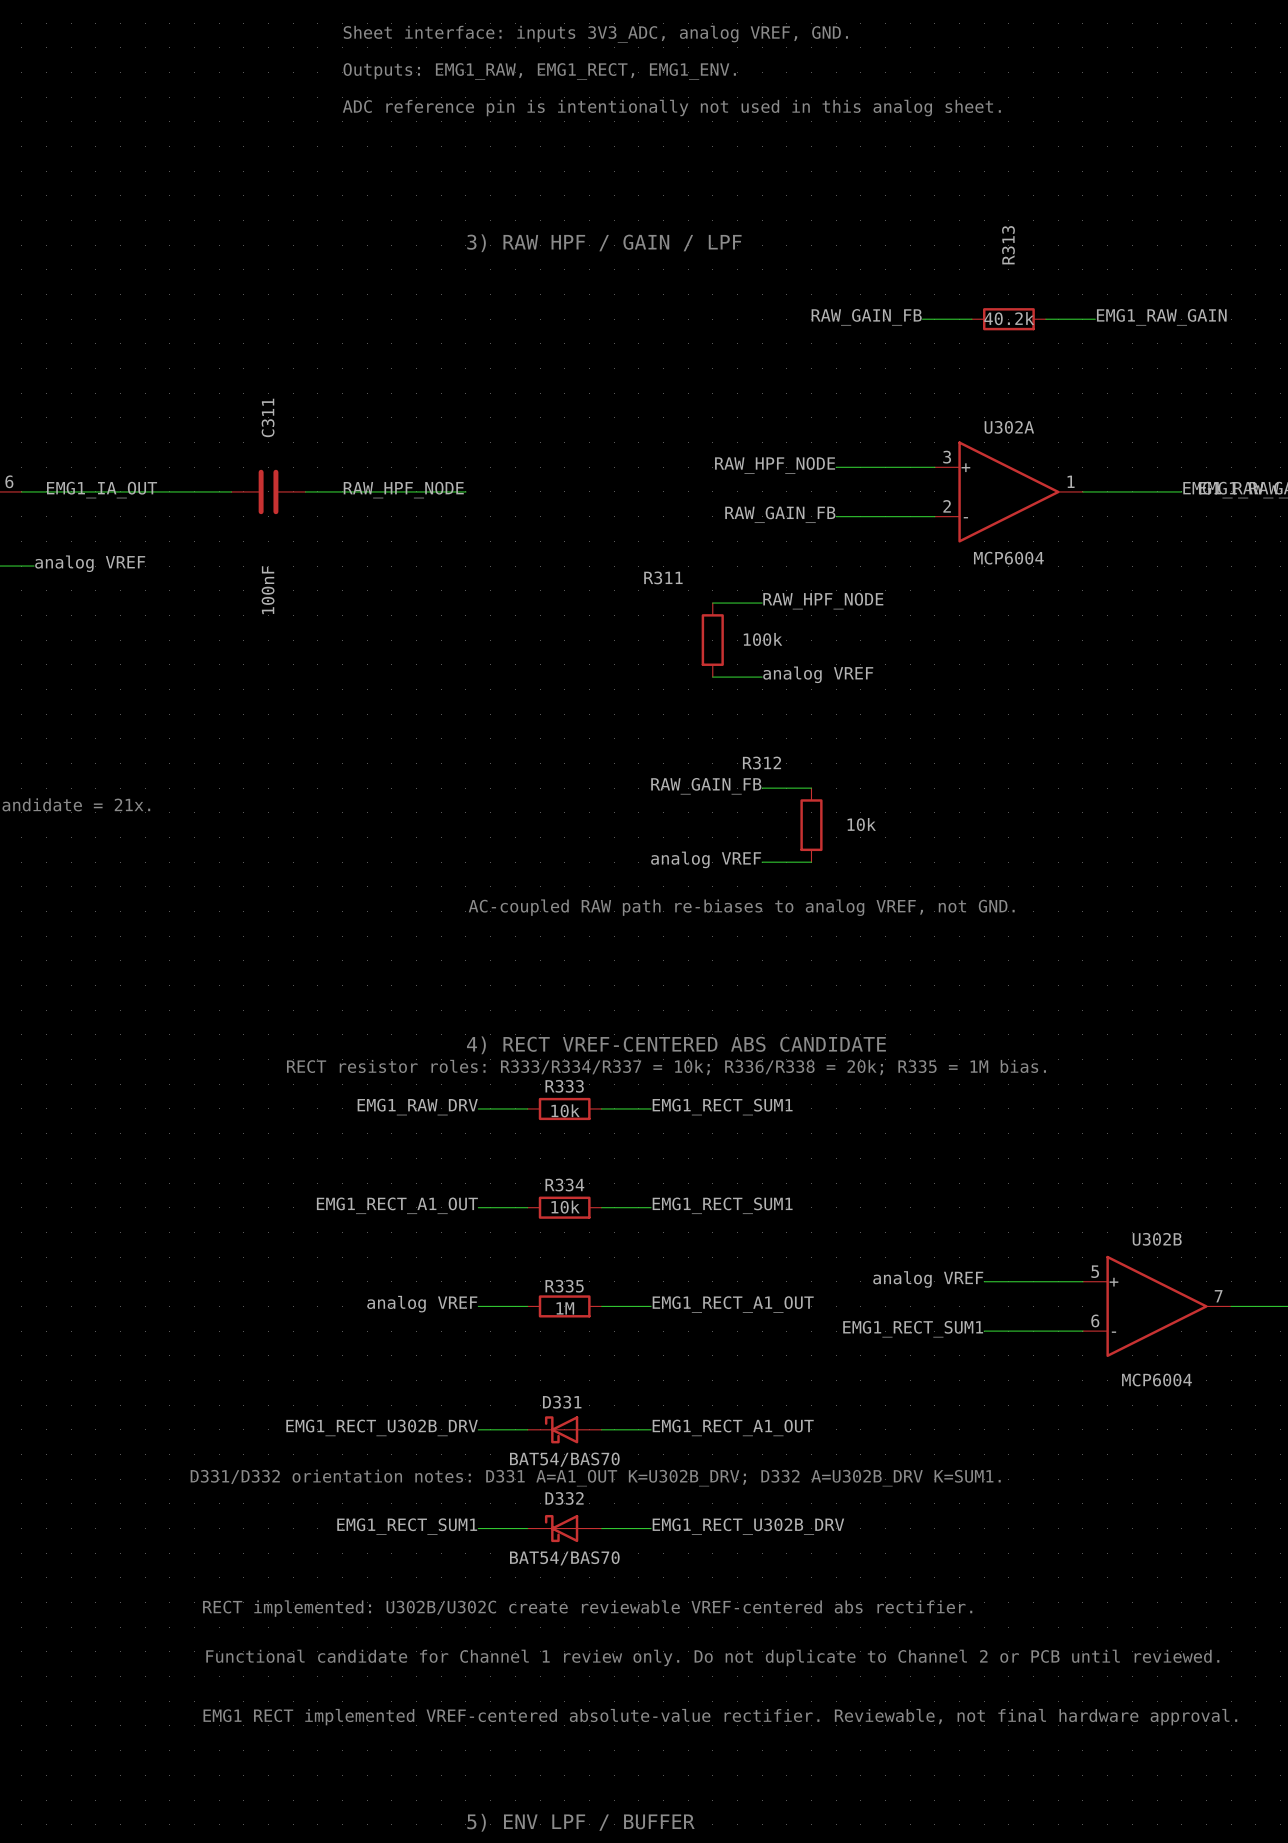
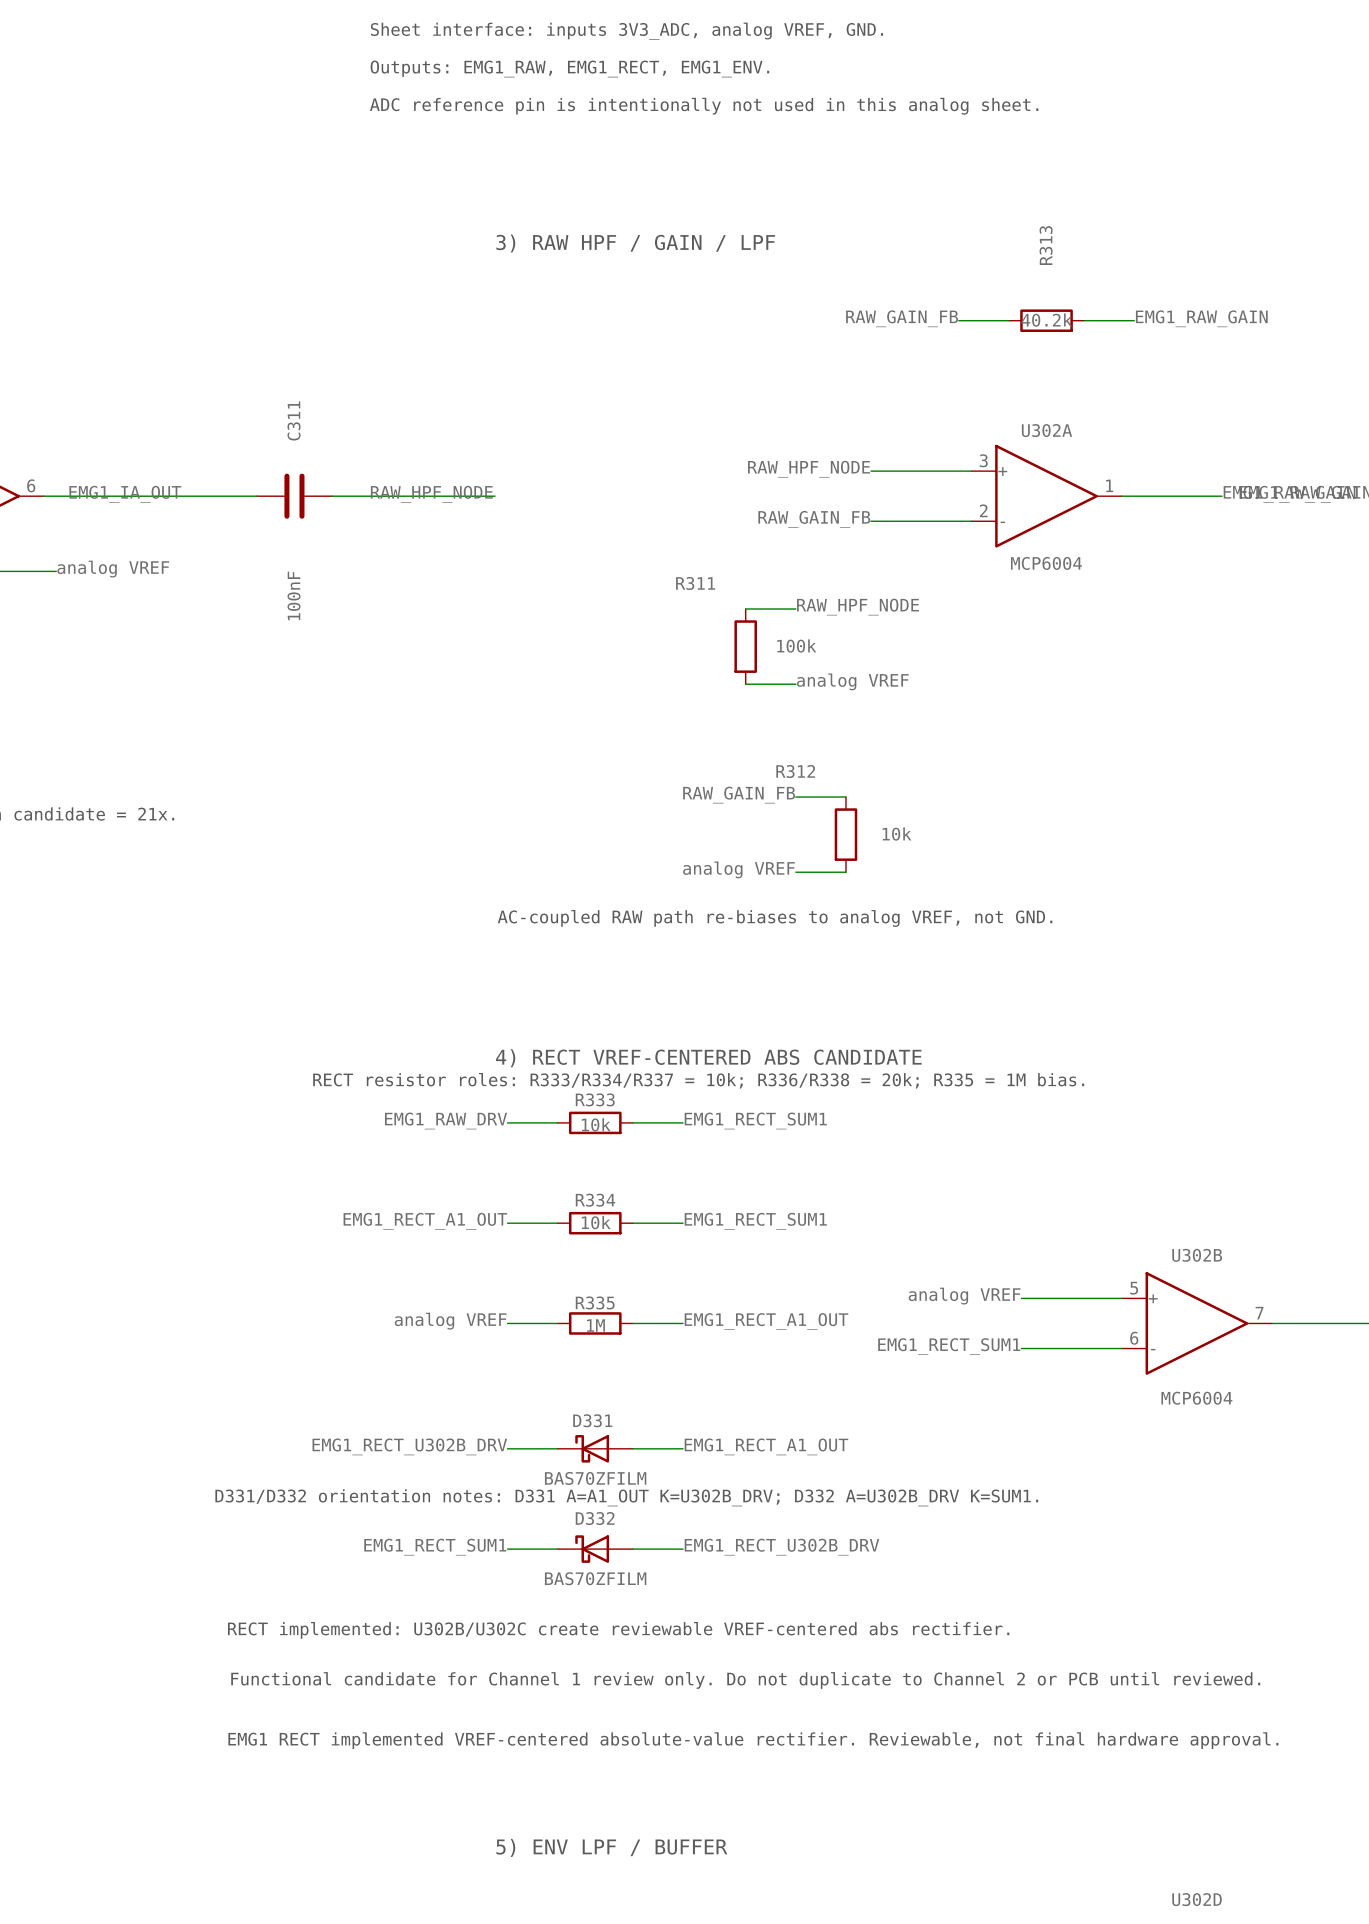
D331 value: BAT54/BAS70 (564, 1459) -> BAS70ZFILM (595, 1478)
D332 value: BAT54/BAS70 (564, 1558) -> BAS70ZFILM (595, 1578)

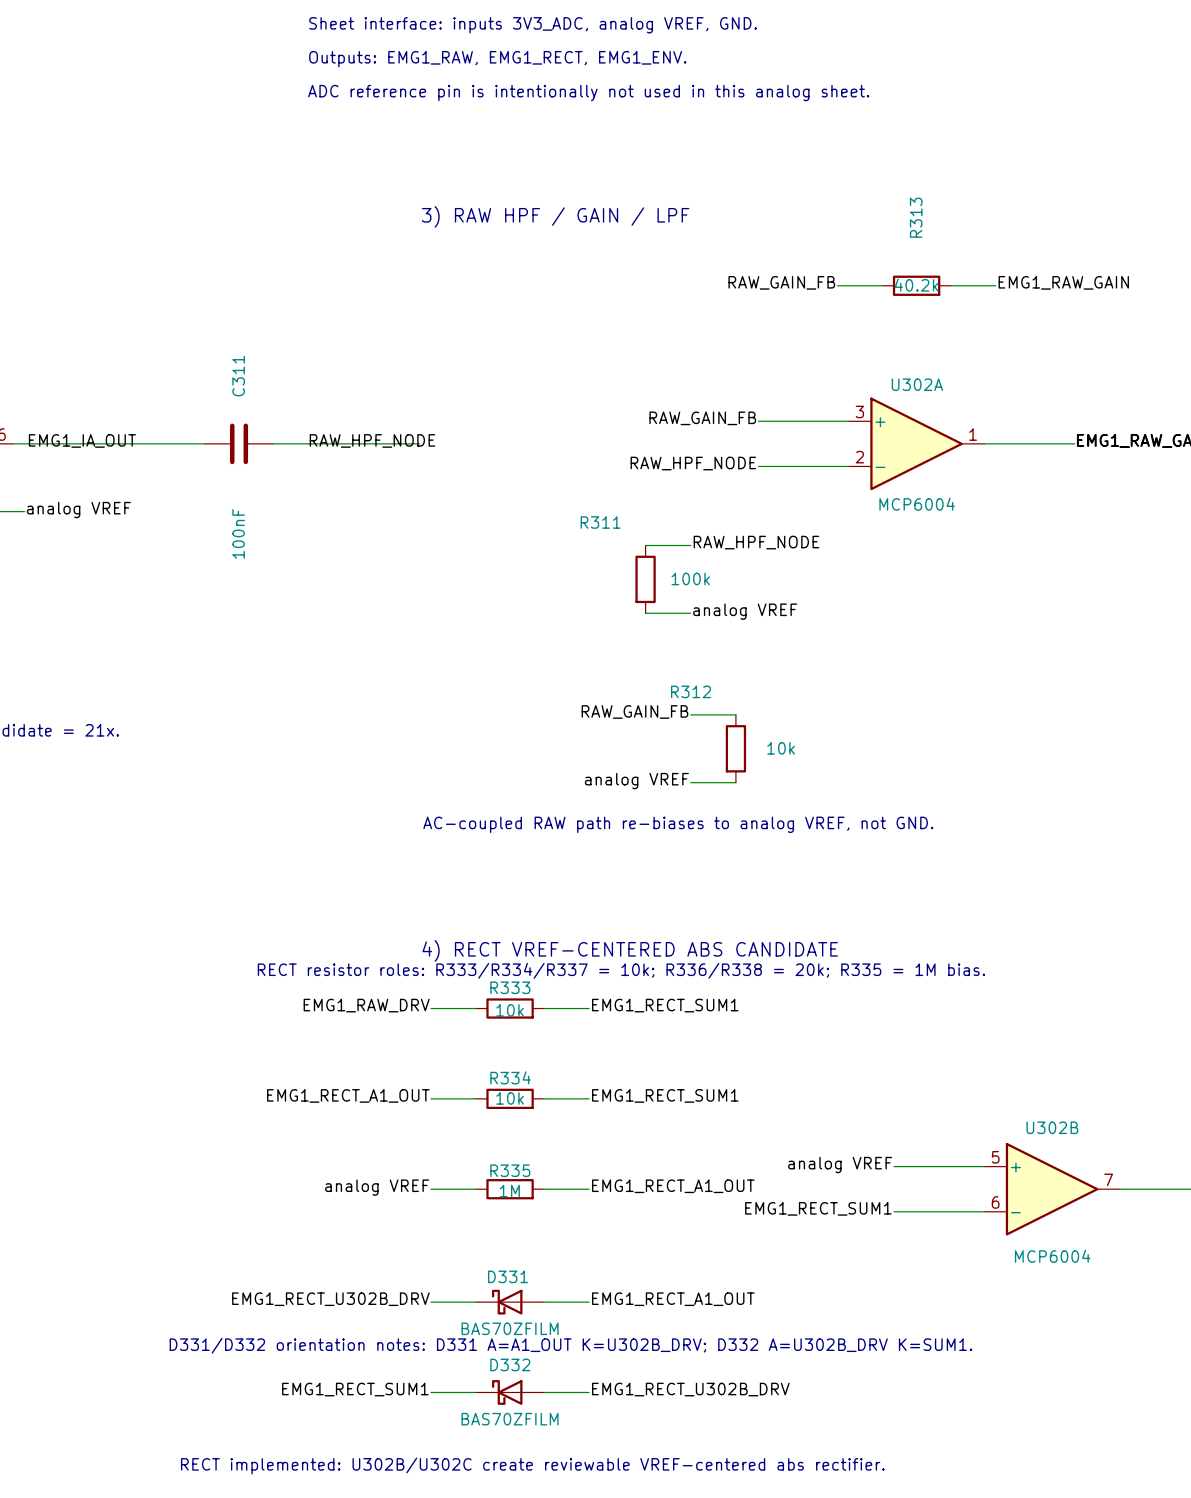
label: RAW_HPF_NODE (808, 469) -> RAW_GAIN_FB (702, 418)
label: RAW_GAIN_FB (814, 519) -> RAW_HPF_NODE (693, 463)

